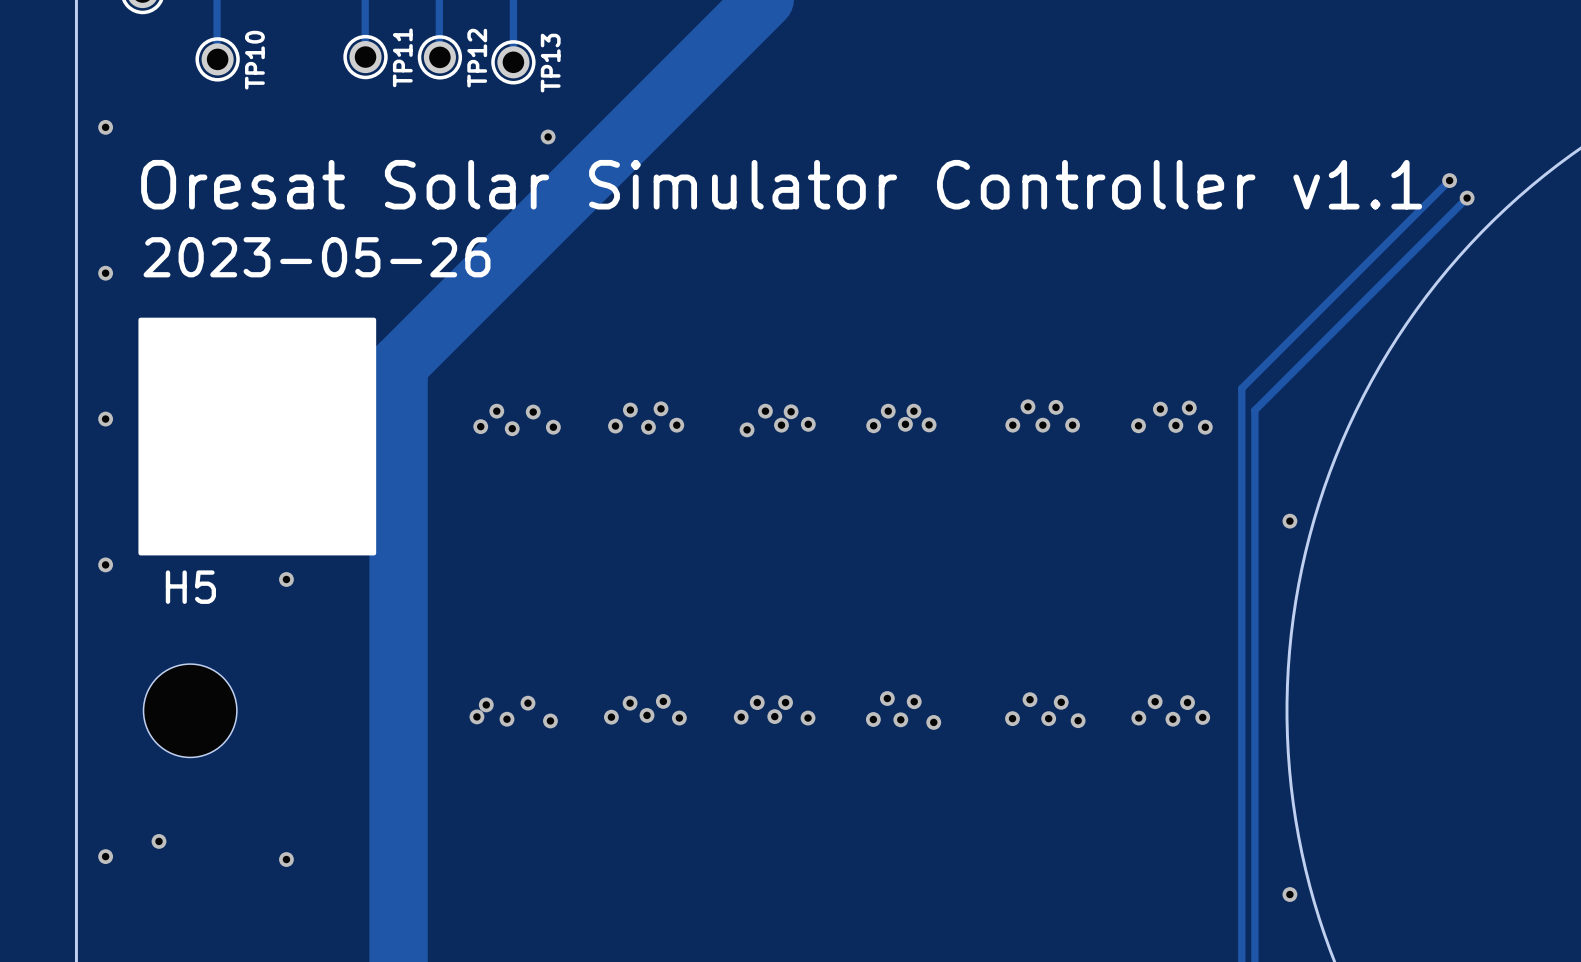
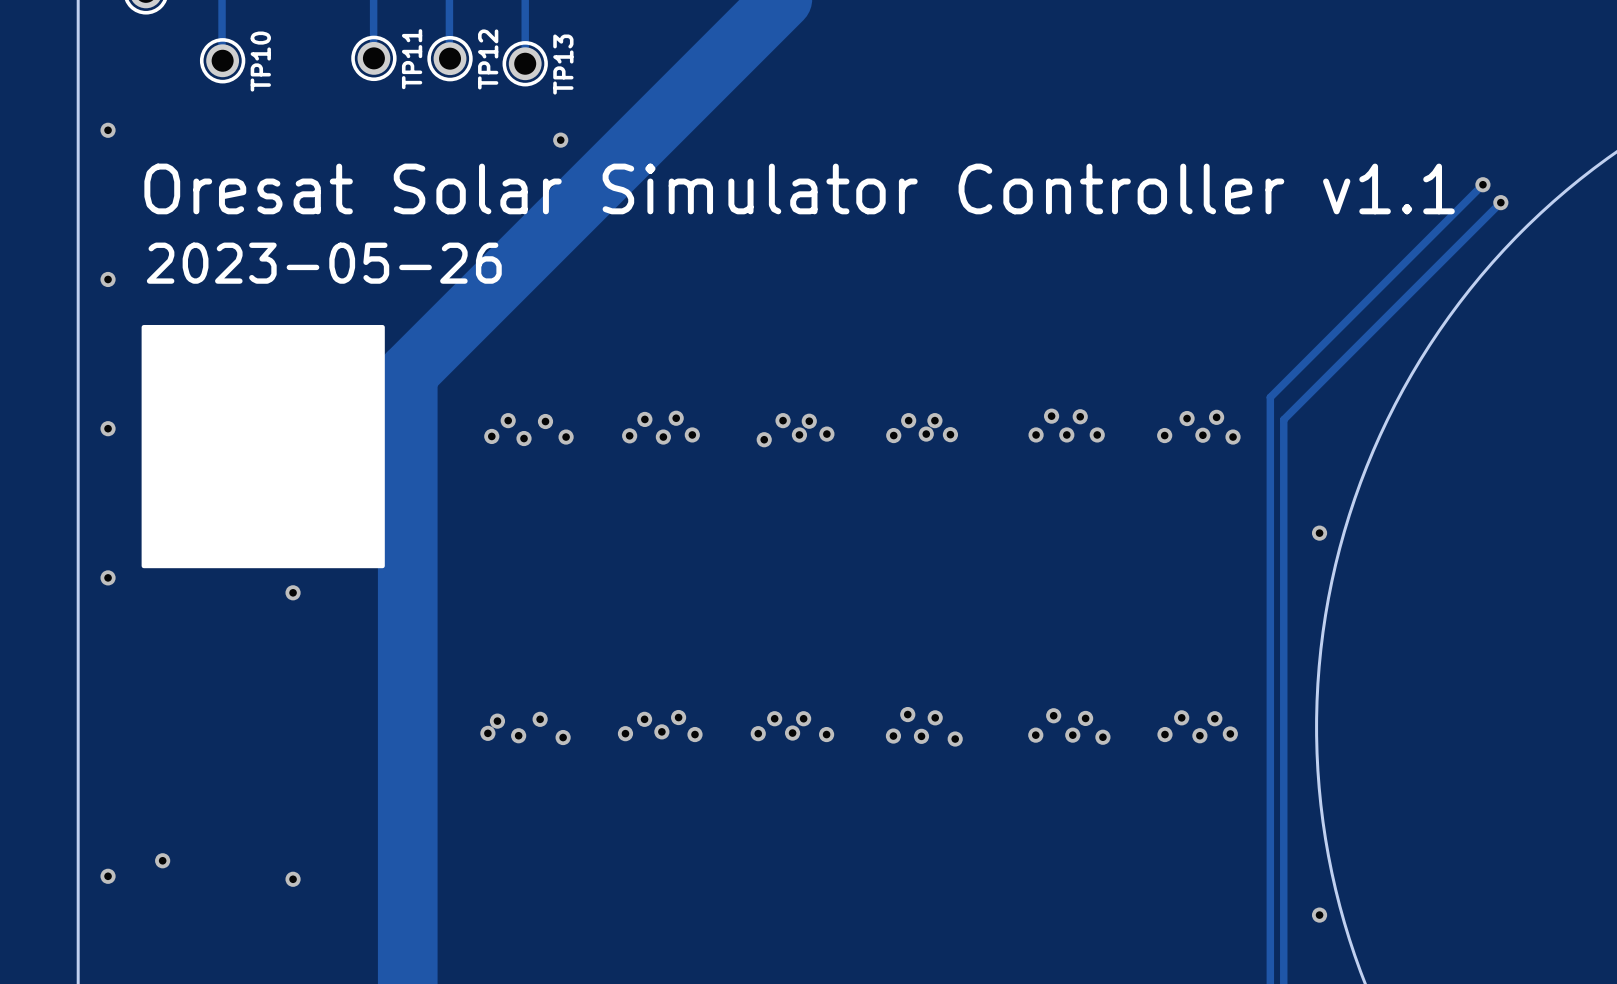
H5: (190, 710) -> none

